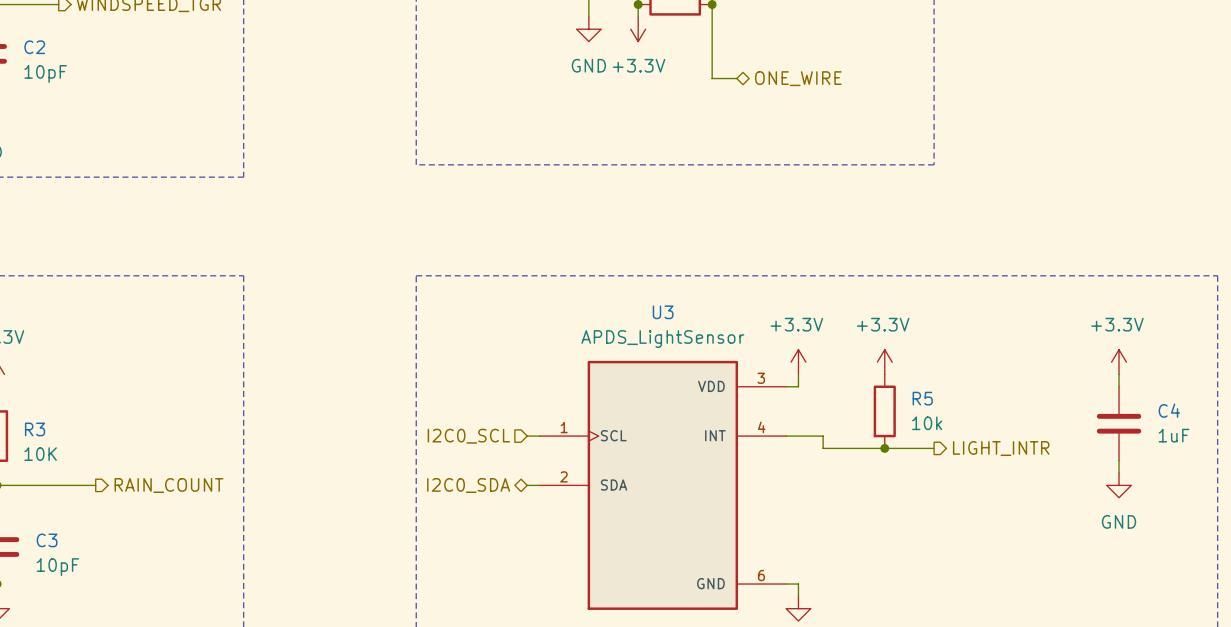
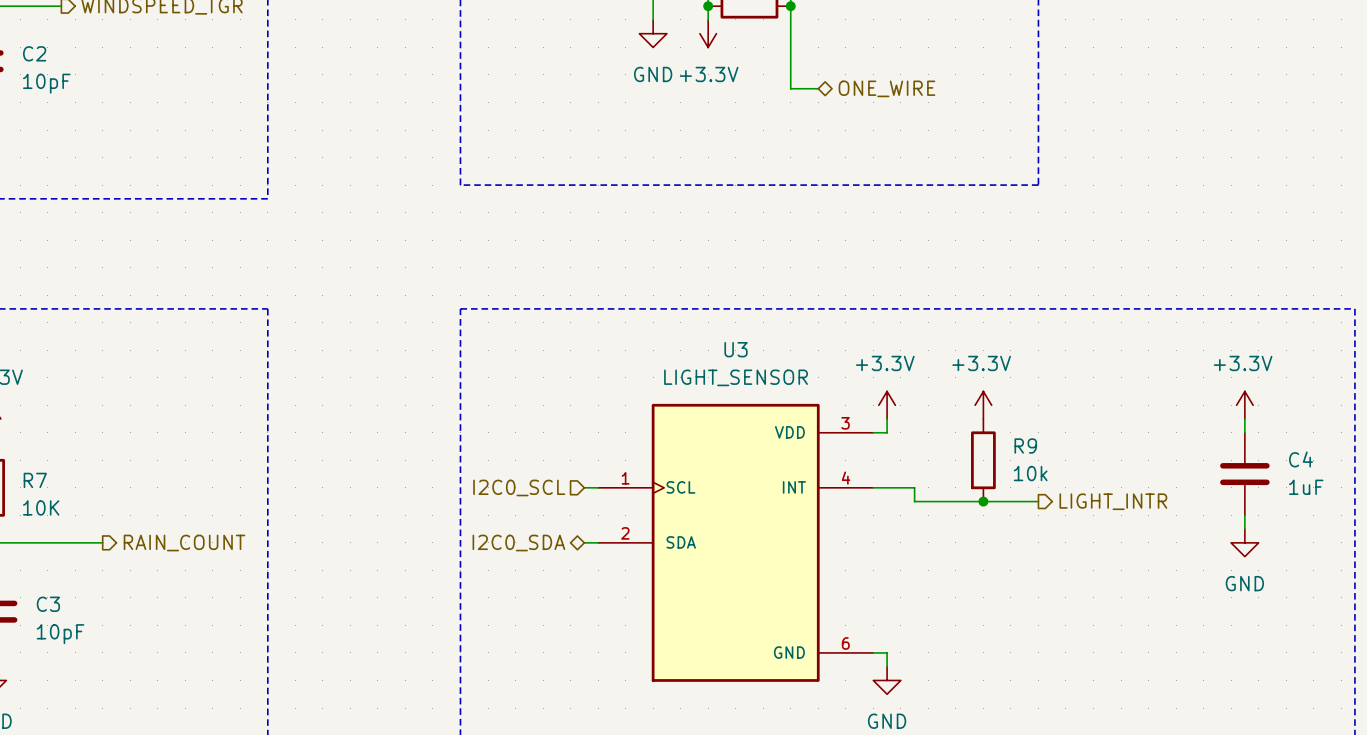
U3 value: APDS_LightSensor (662, 339) -> LIGHT_SENSOR (736, 377)
R5 name: R5 (922, 398) -> R9 (1025, 446)
R3 name: R3 (35, 429) -> R7 (35, 480)

